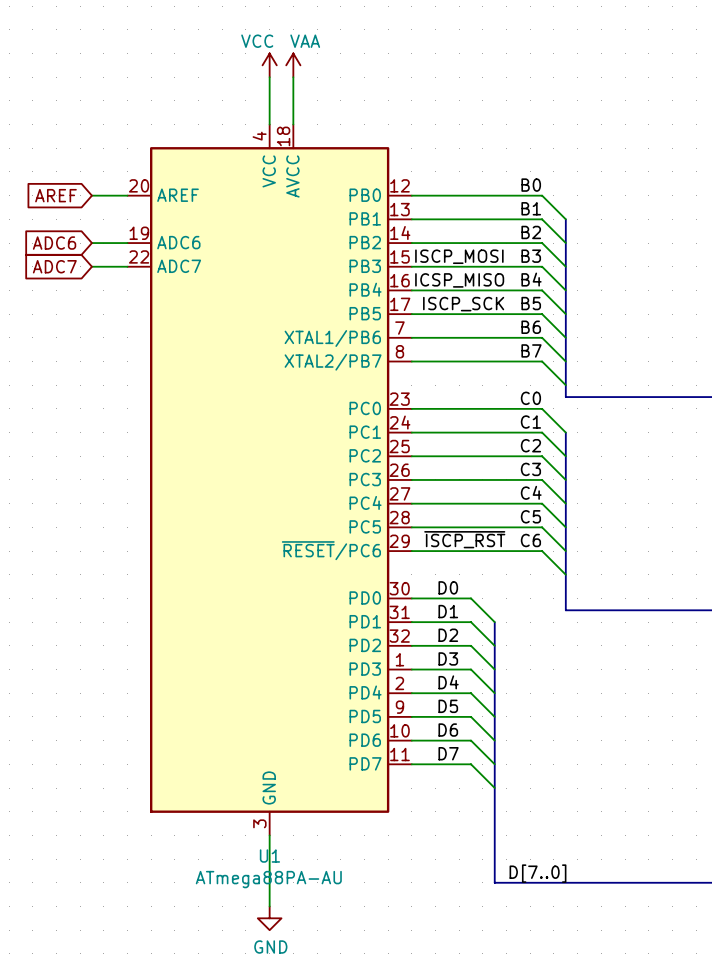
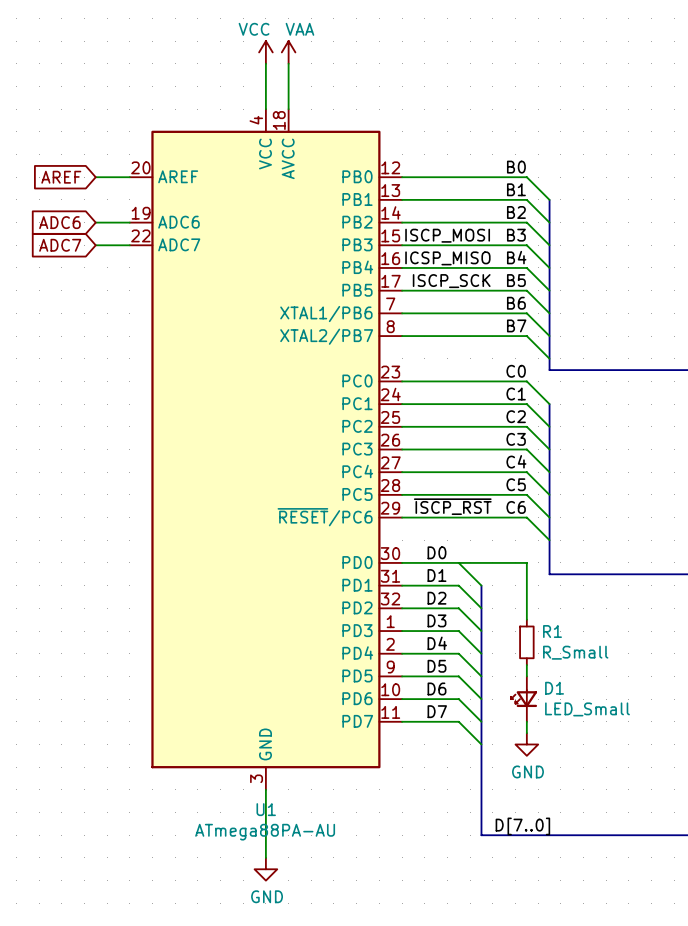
wire: none -> (458, 562) (526, 562) (526, 619)
R1: none -> R_Small (526, 642)
wire: none -> (526, 665) (526, 676)
D1: none -> LED_Small (524, 699)
wire: none -> (526, 721) (526, 733)
power symbol: none -> GND (526, 744)

